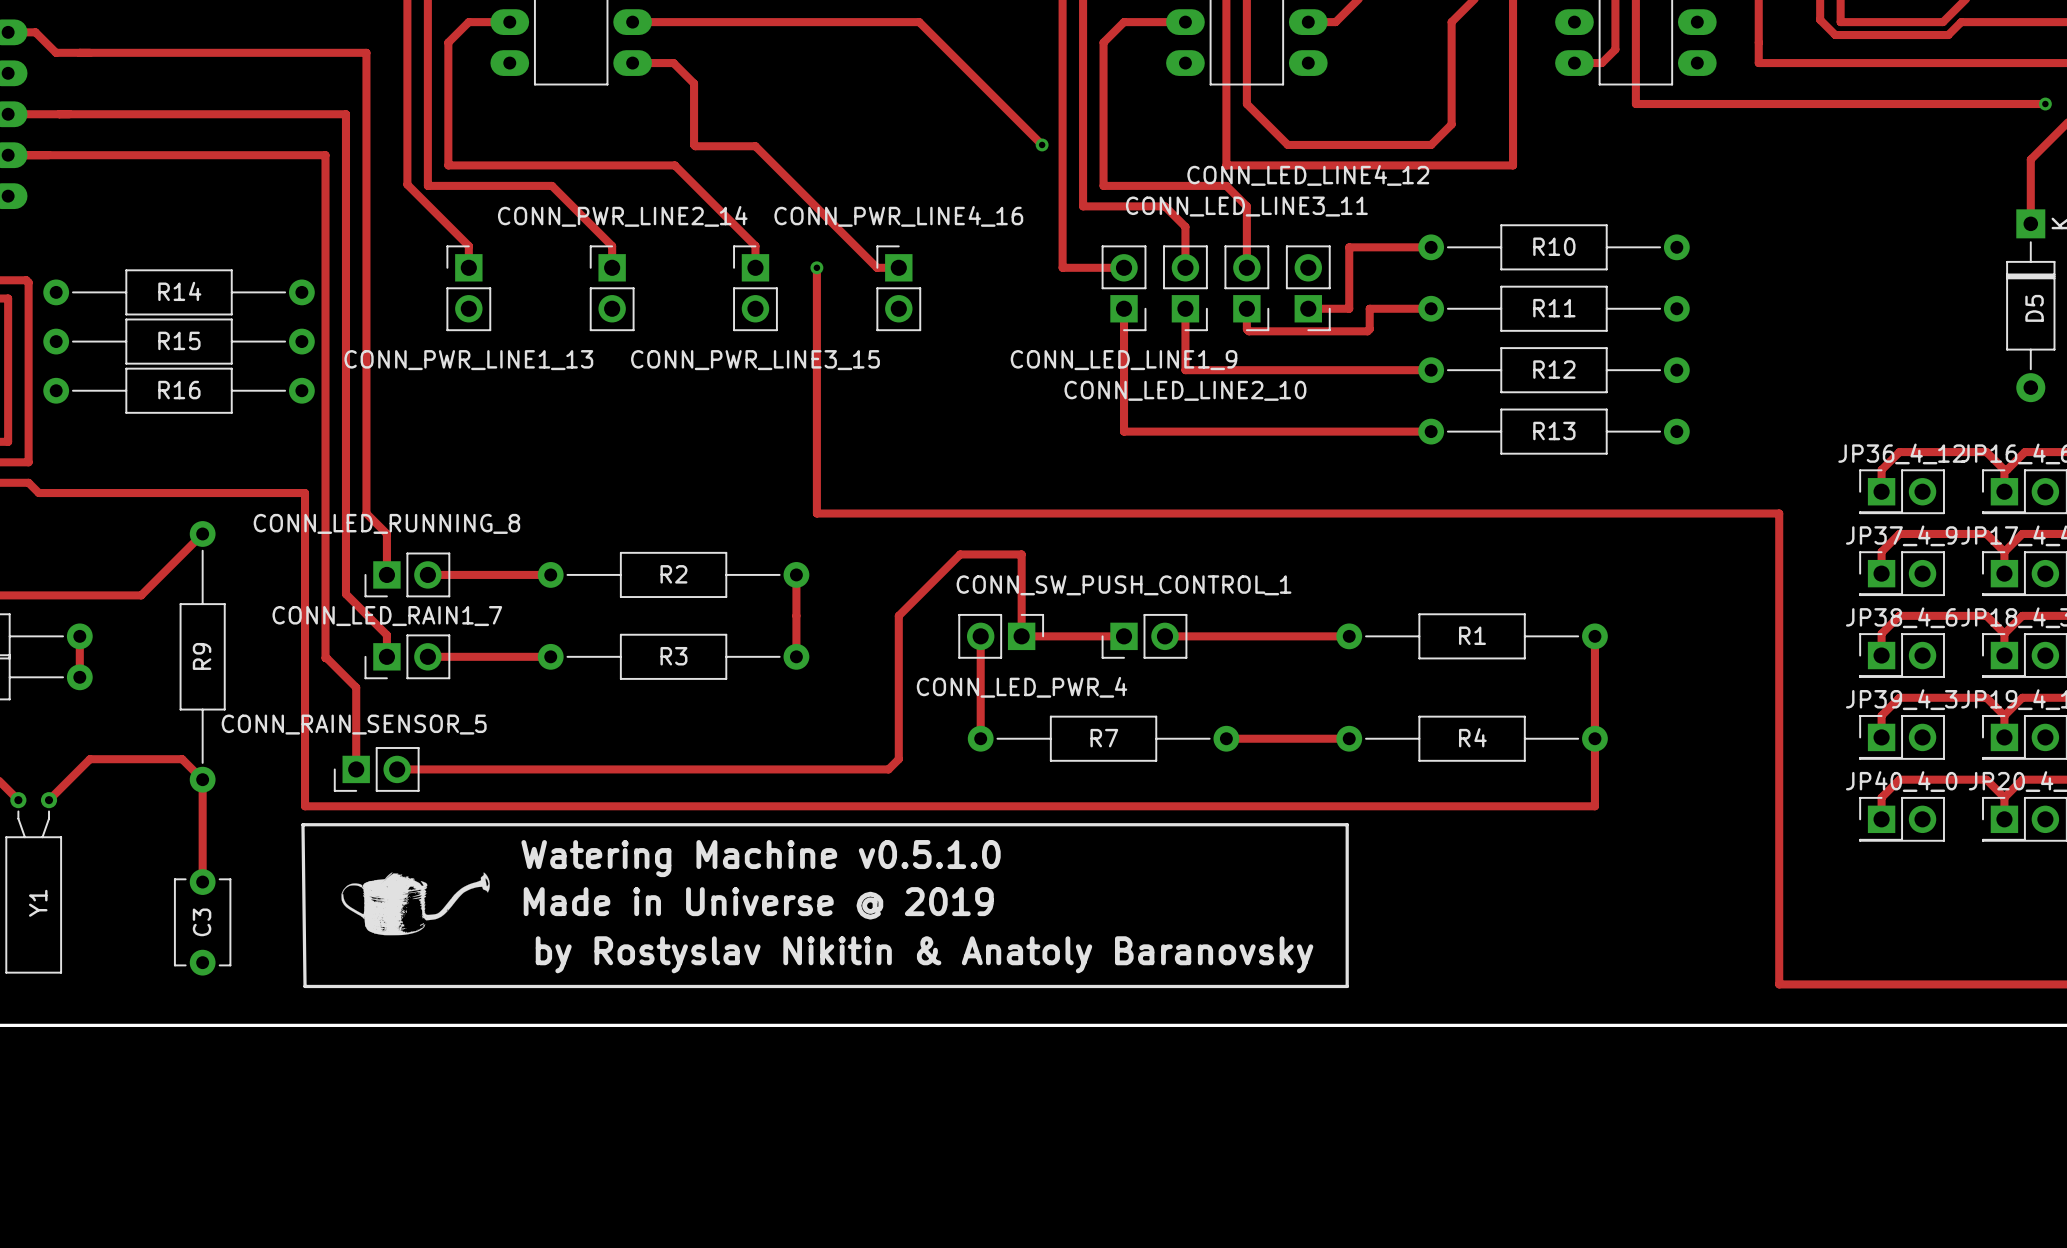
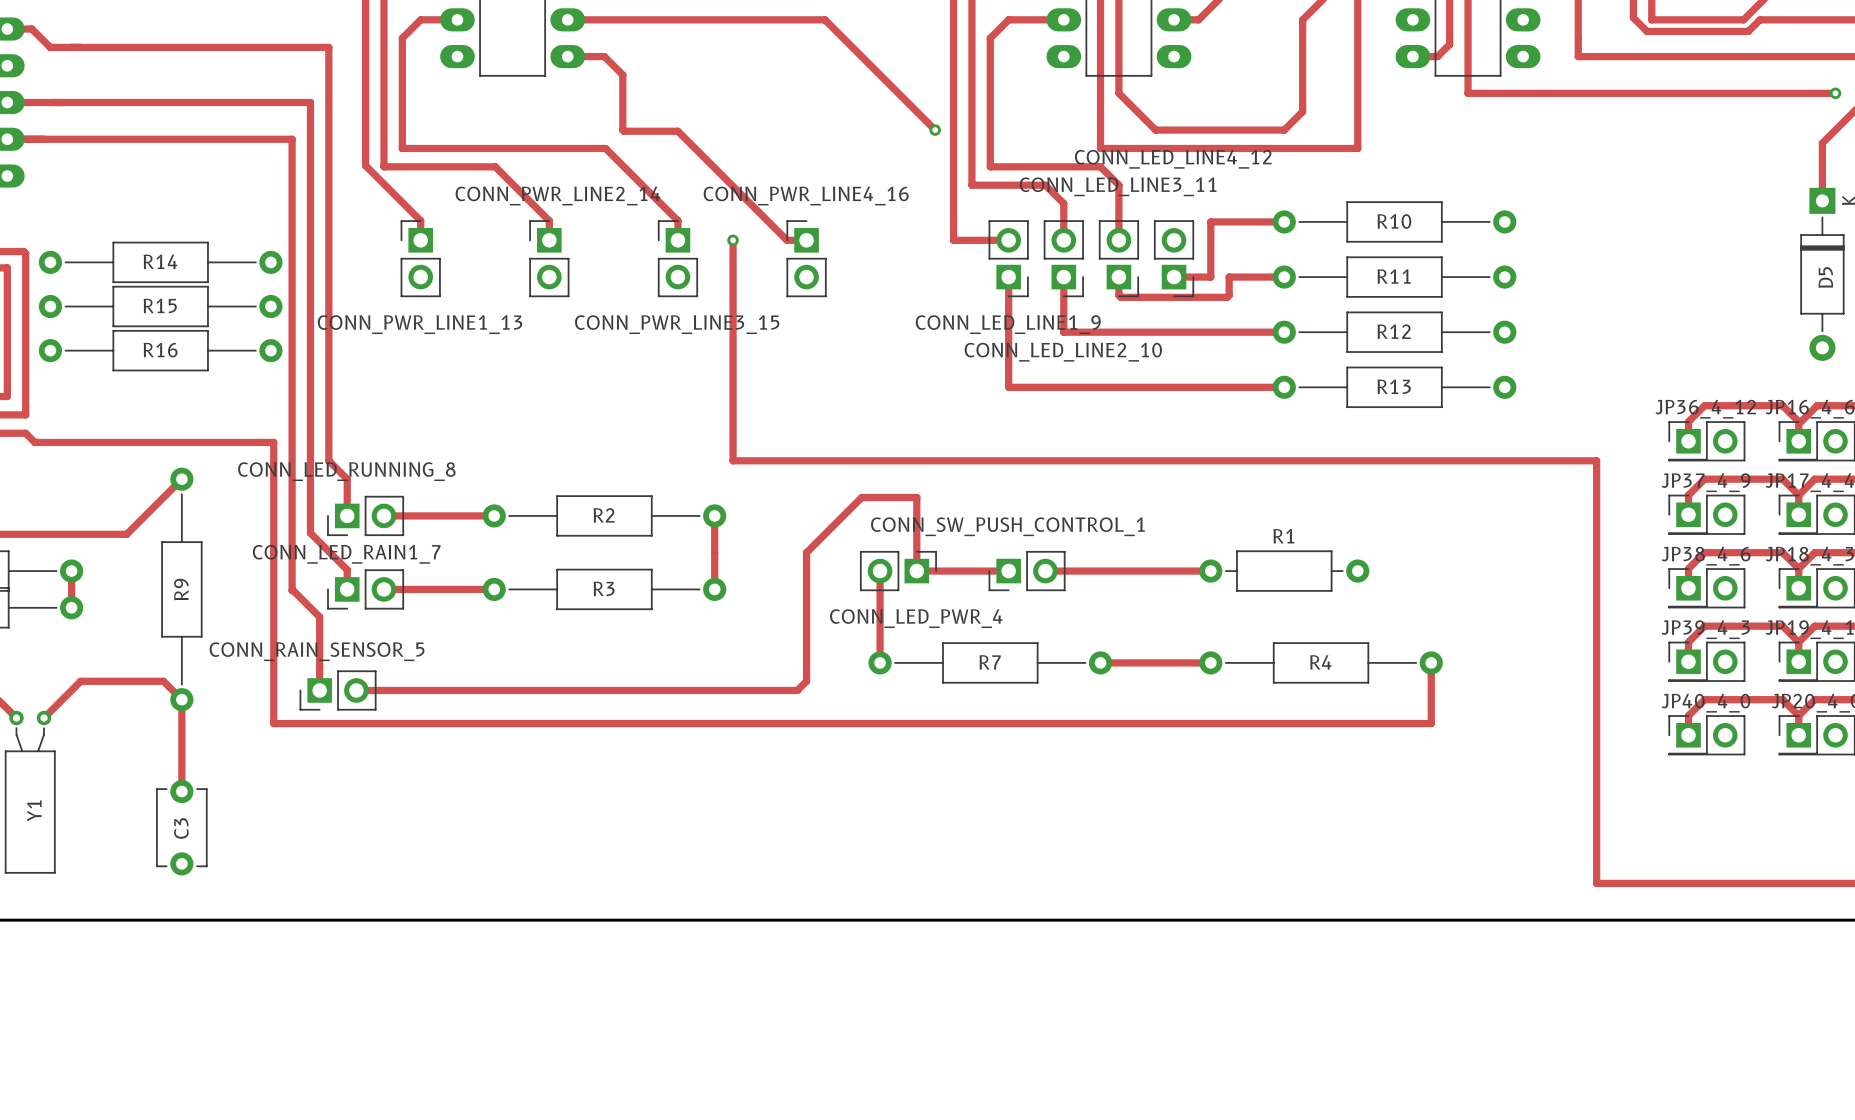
R1 footprint: [1336, 613, 1608, 660] -> [1199, 550, 1370, 592]
R1 name position: R1 (1472, 635) -> R1 (1283, 536)
track: (1594, 636) (1594, 738) -> none
line: (302, 824) (1347, 824) (1347, 986) (305, 986) (302, 824) -> none
text: Watering Machine v0.5.1.0 (761, 858) -> none
drawing: [341, 872, 490, 936] -> none
text: Made in Universe @ 2019 (758, 903) -> none
text: by Rostyslav Nikitin & Anatoly Baranovsky (924, 954) -> none

